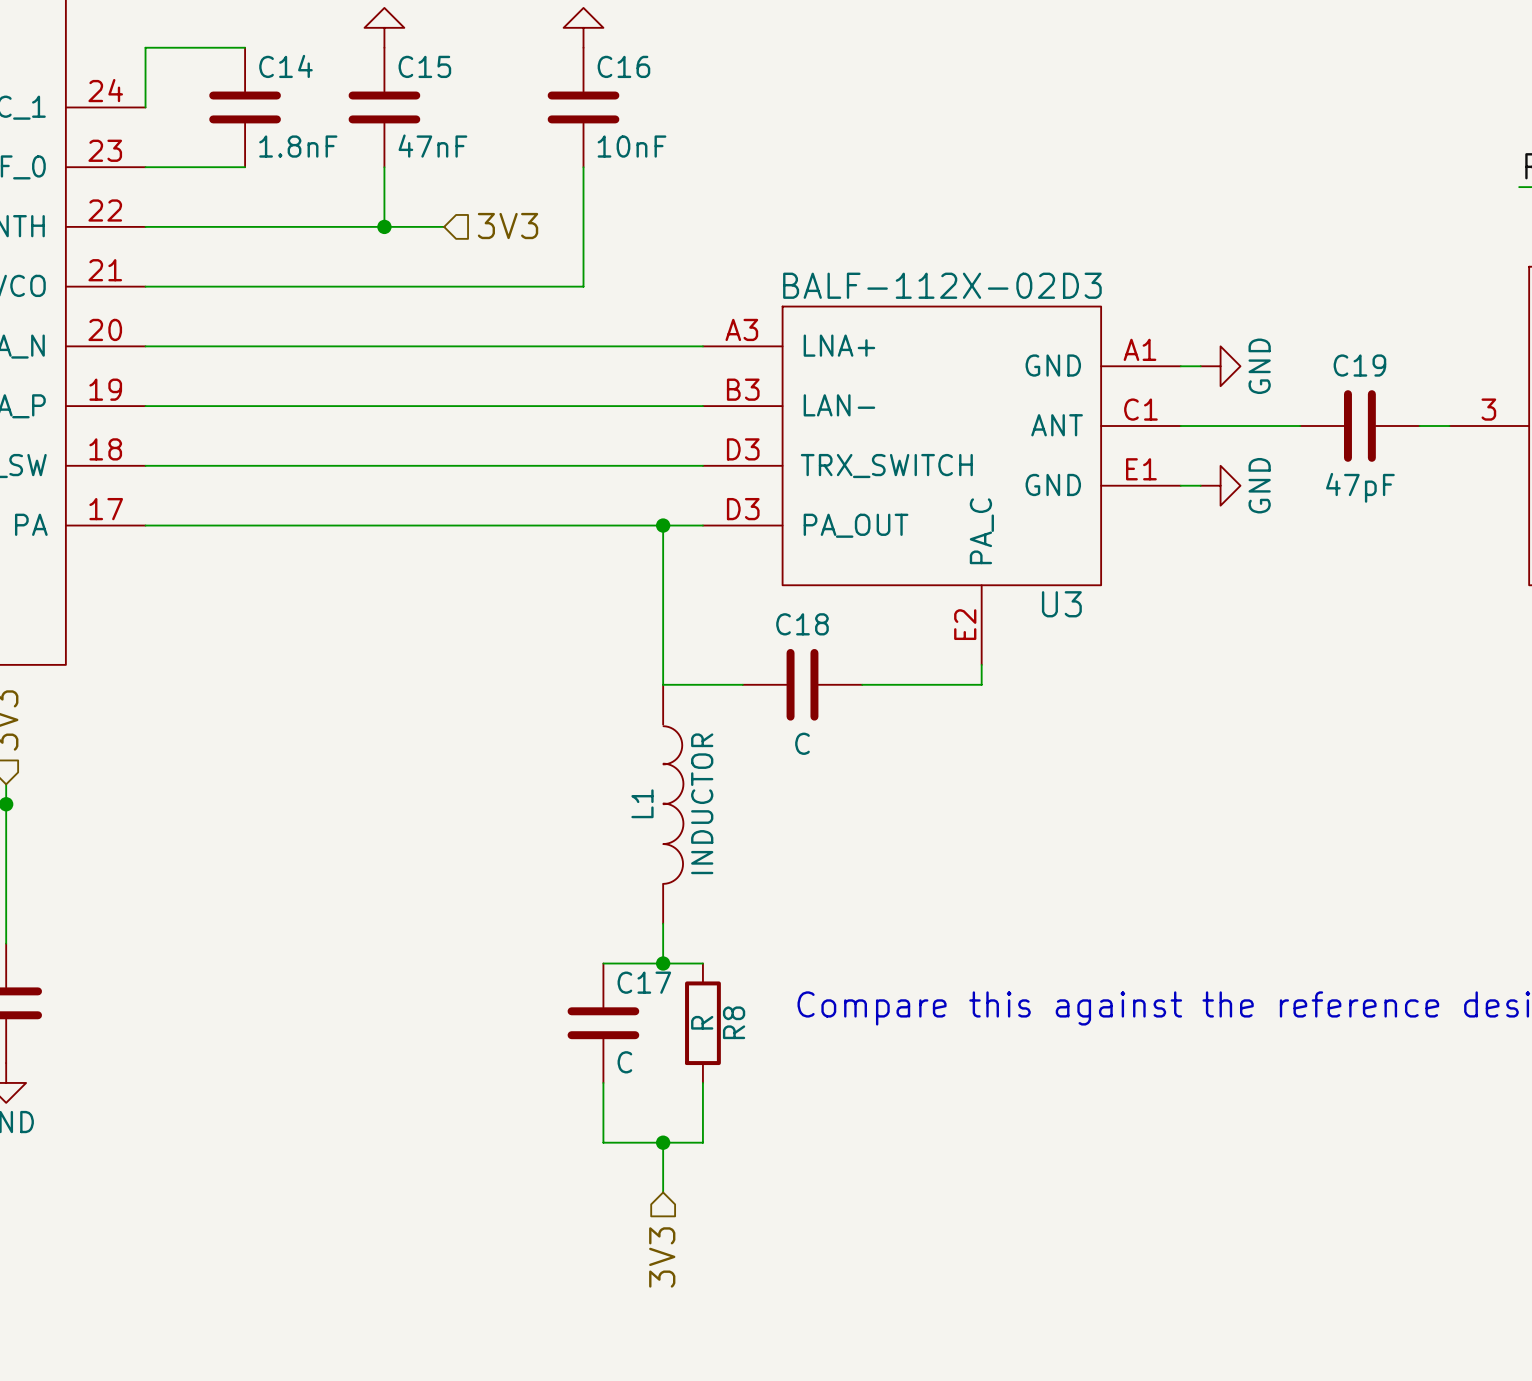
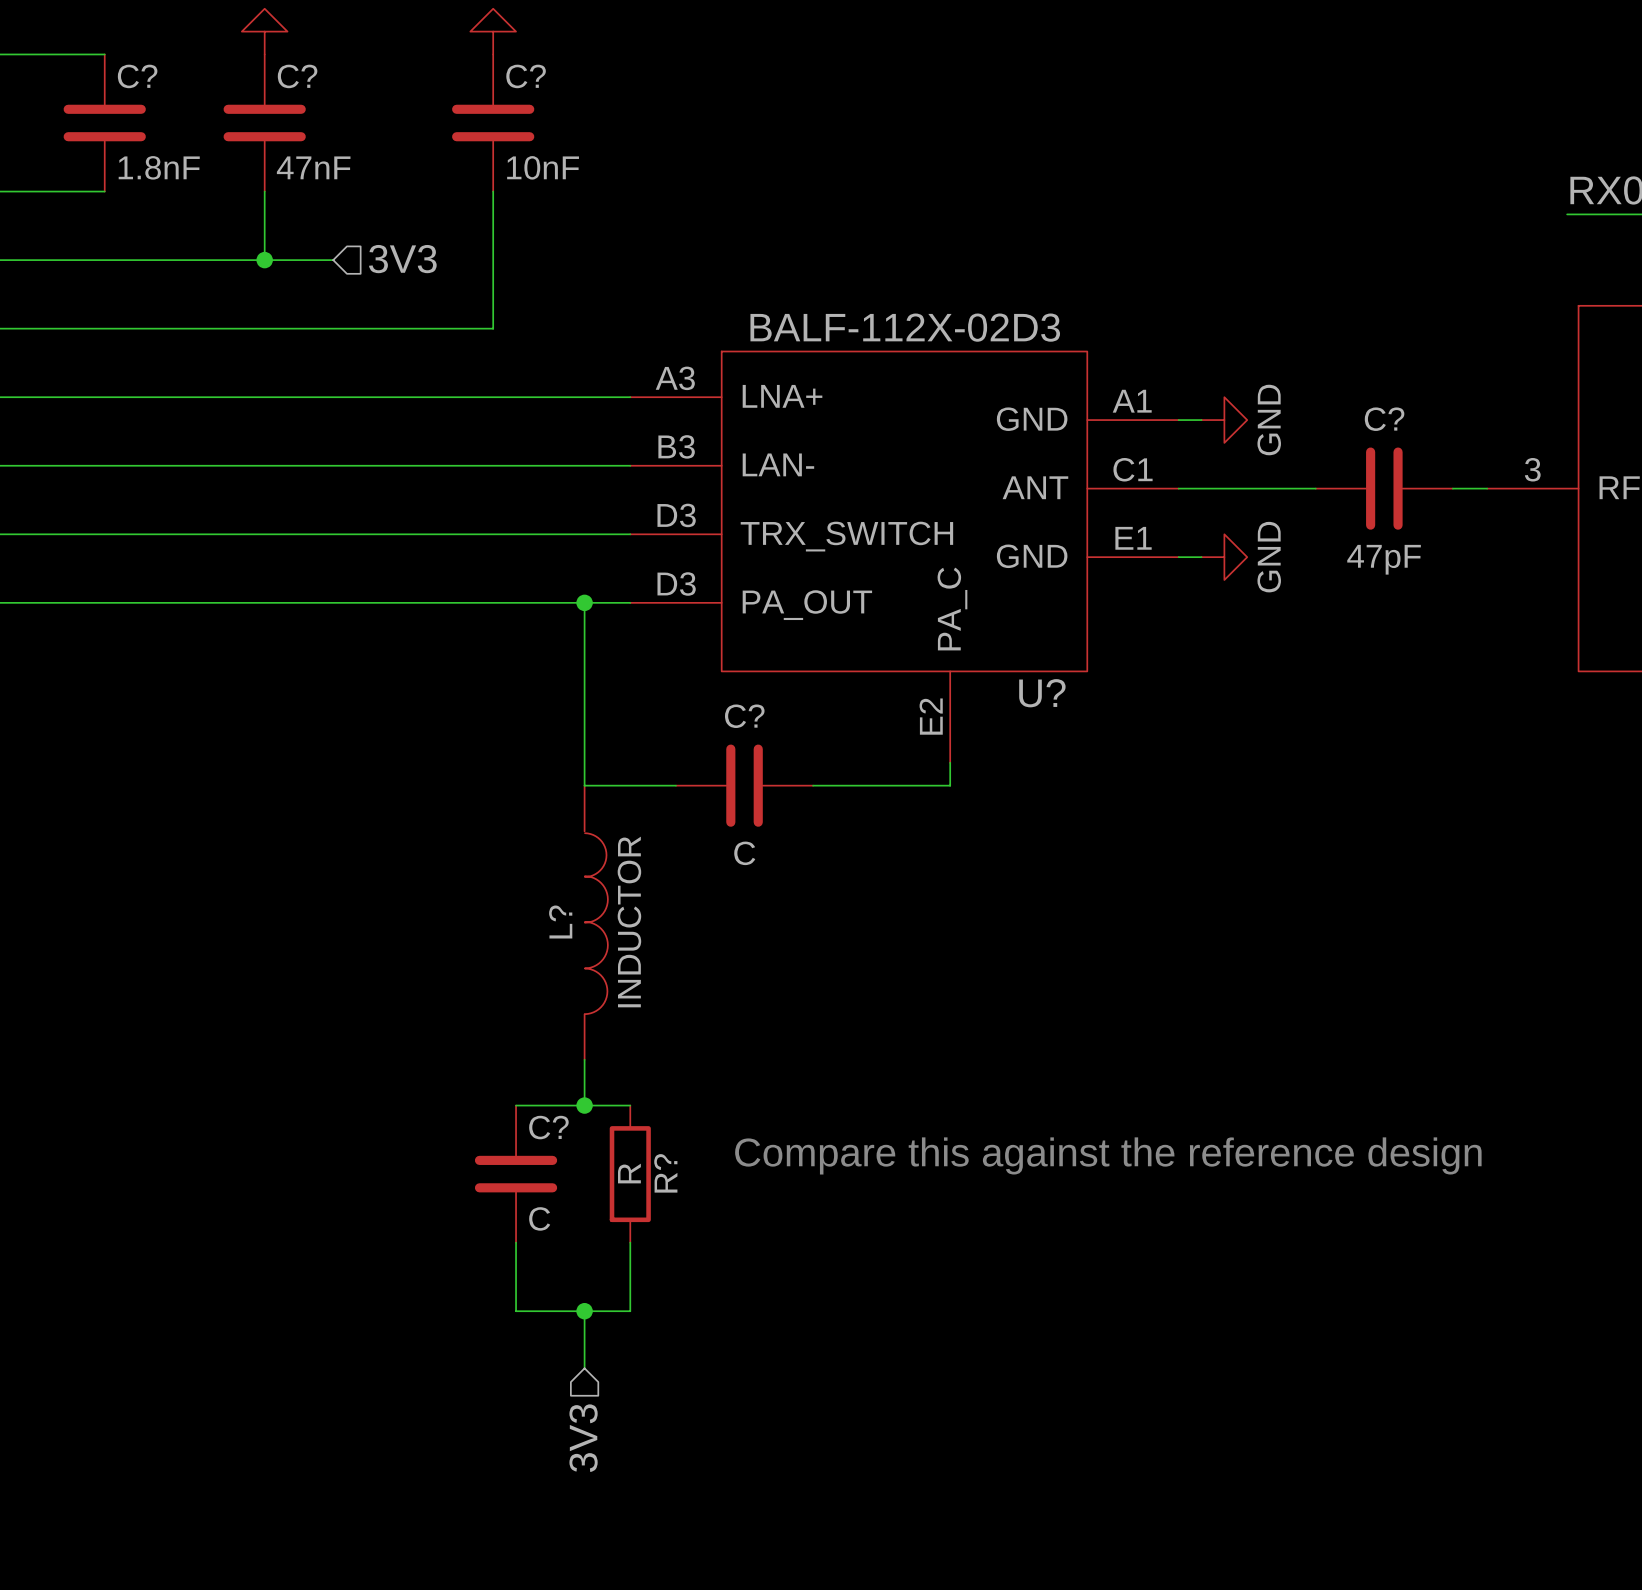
C14 name: C14 (285, 66) -> C? (137, 76)
C15 name: C15 (424, 66) -> C? (297, 76)
C16 name: C16 (623, 66) -> C? (526, 76)
C19 name: C19 (1359, 365) -> C? (1384, 419)
U3 name: U3 (1061, 604) -> U? (1042, 693)
C18 name: C18 (802, 624) -> C? (744, 716)
L1 name: L1 (642, 803) -> L? (560, 922)
C17 name: C17 (644, 982) -> C? (548, 1127)
R8 name: R8 (734, 1022) -> R? (665, 1173)

